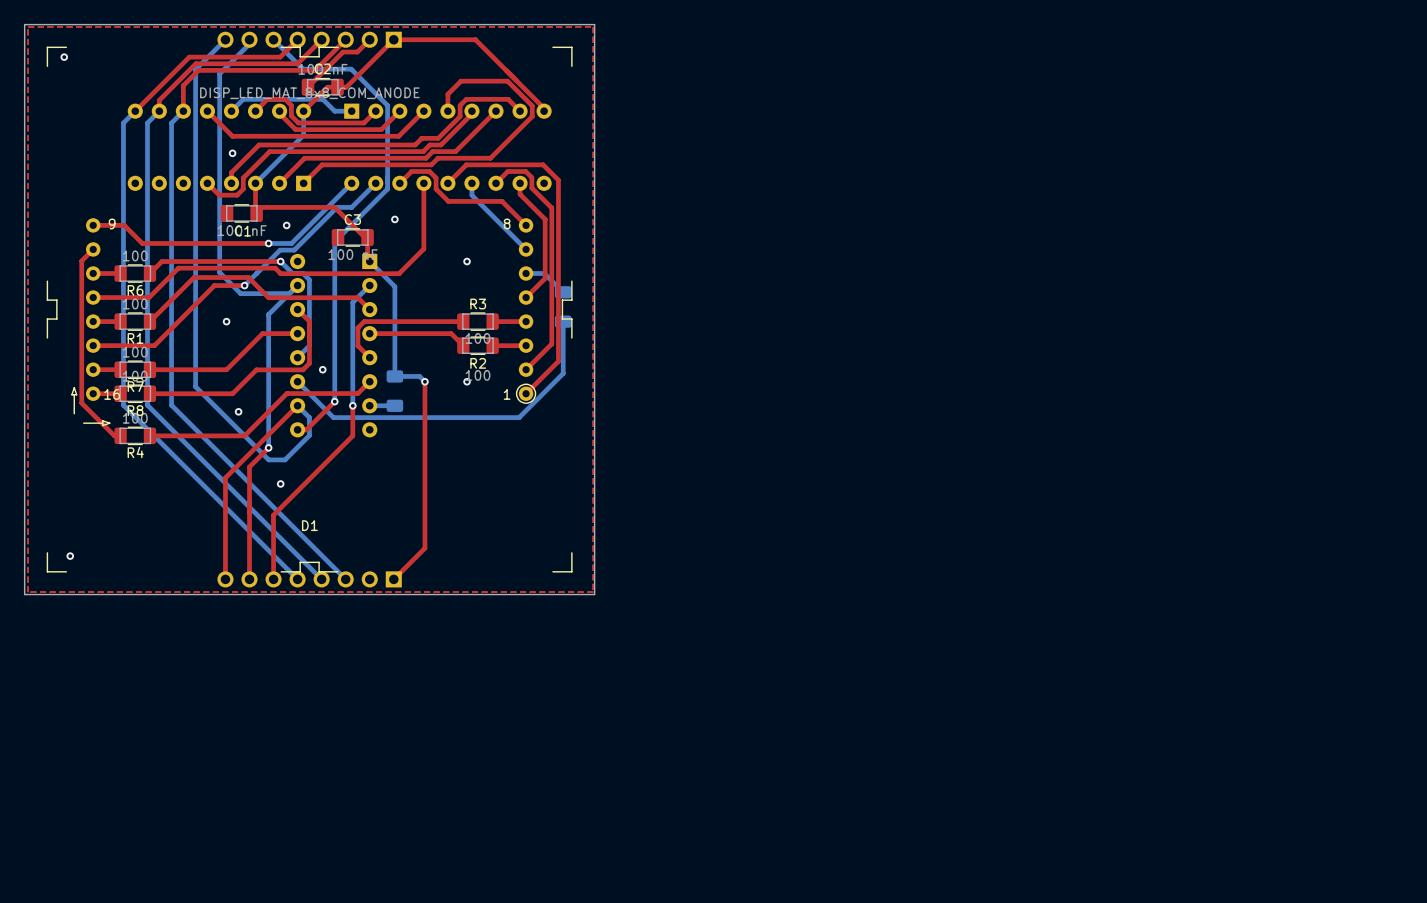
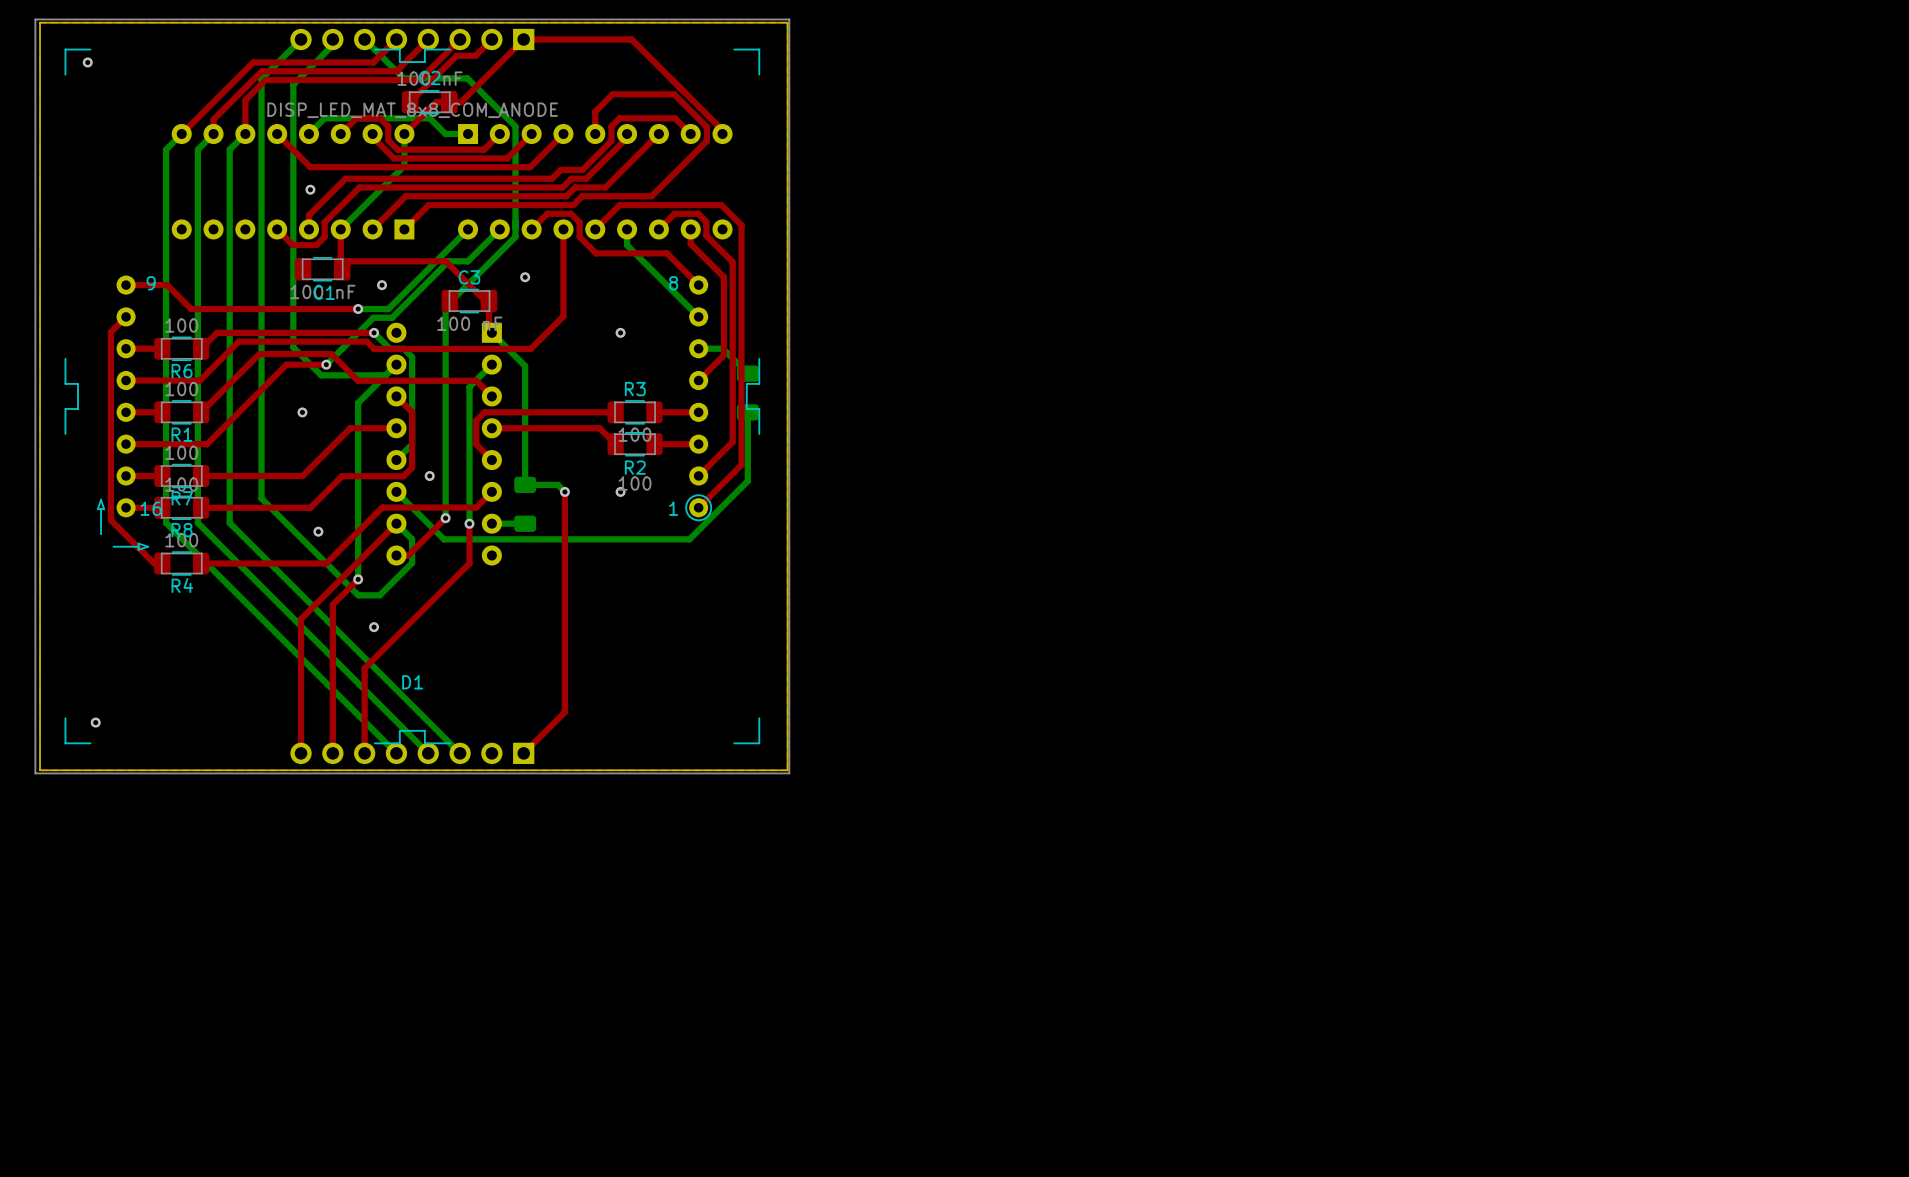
board edge: none -> (40, 22) (40, 770) (787, 770) (787, 22) (40, 22)

